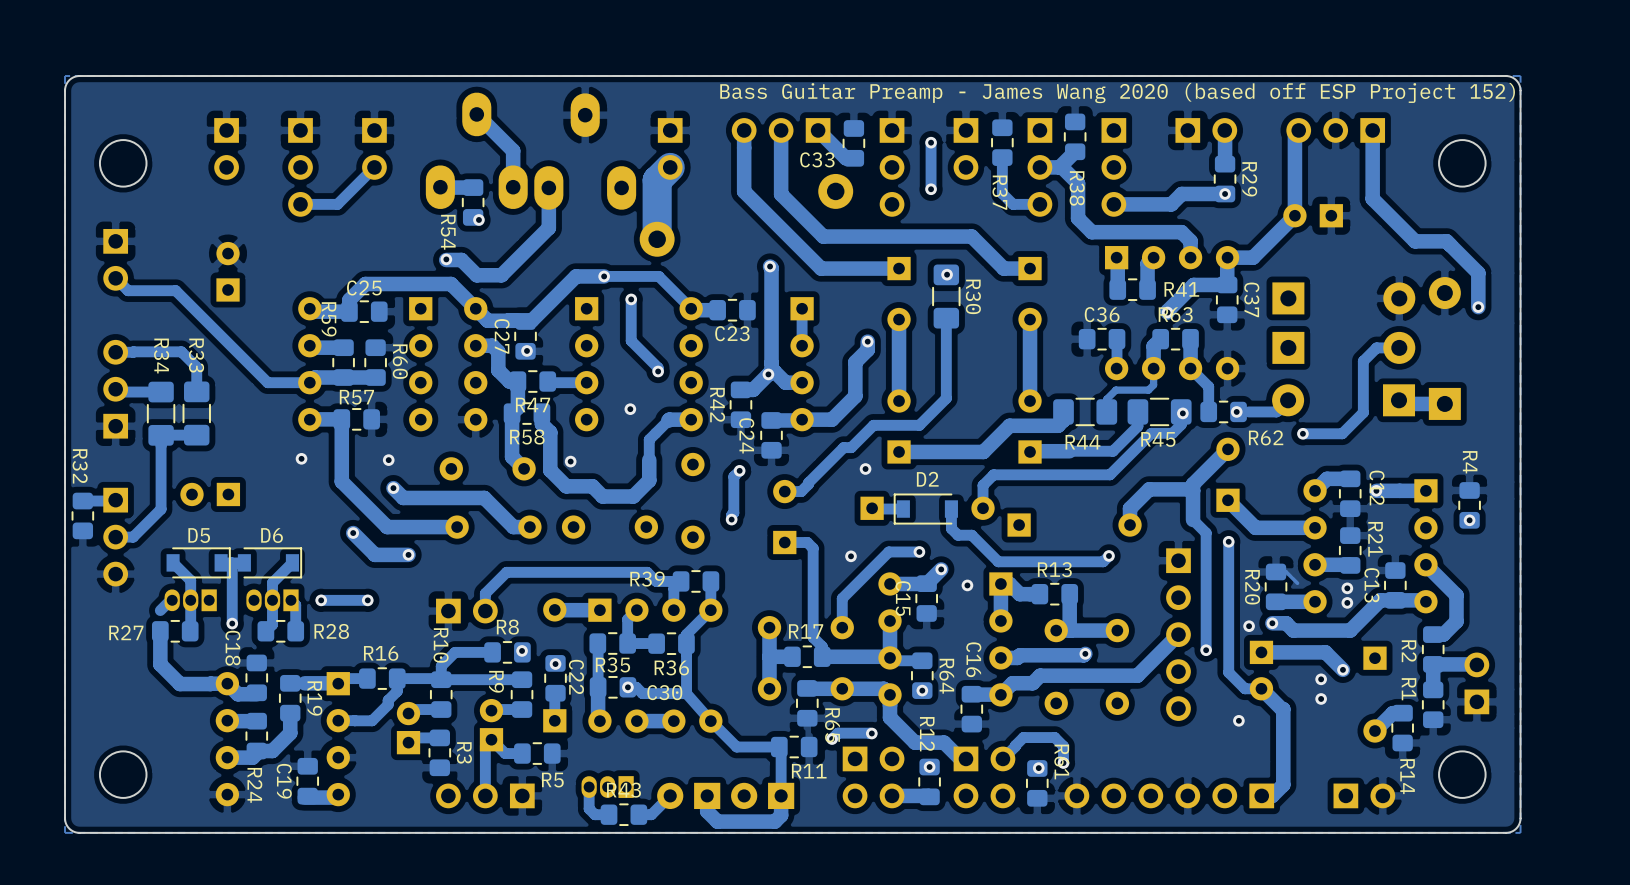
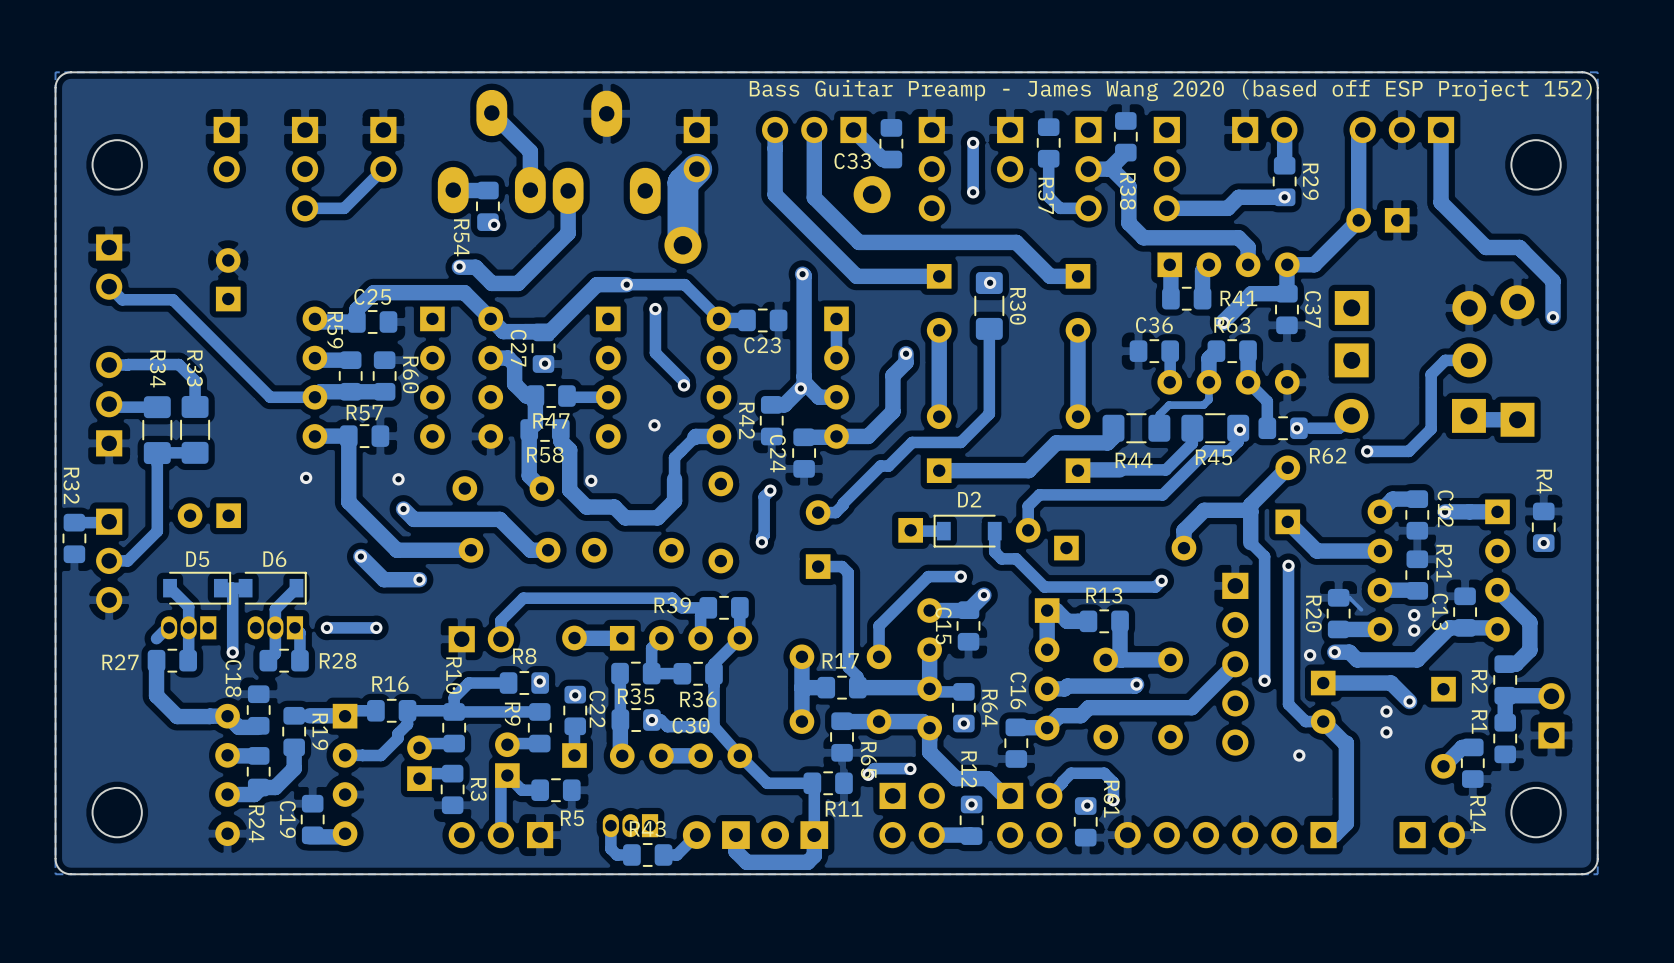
via: (865, 469) -> none
via: (851, 556) -> none
via: (967, 585) -> none

